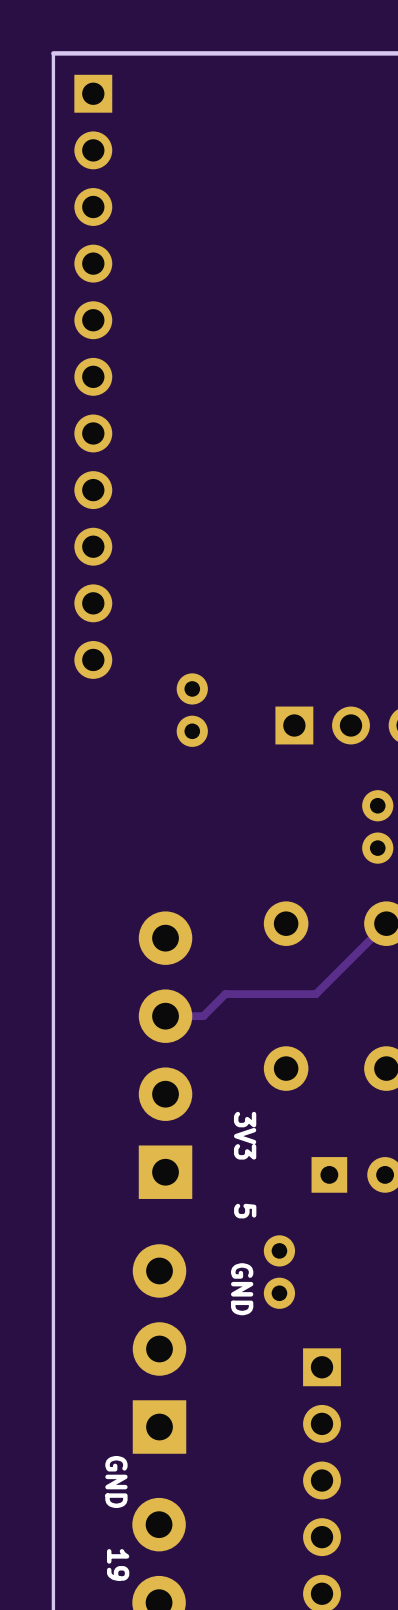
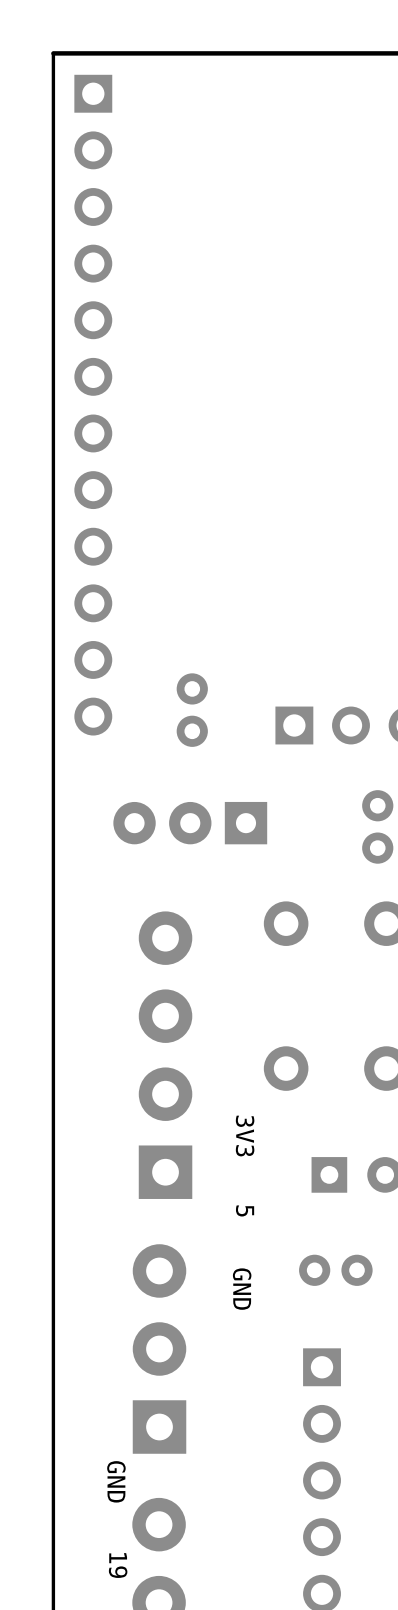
part: none -> (93, 405)
part: none -> (190, 823)
track: (386, 923) (316, 994) (225, 994) (203, 1016) (165, 1016) -> none
part rotation: 0° (279, 1272) -> 90° clockwise (335, 1270)
part position: (279, 1272) -> (335, 1270)

